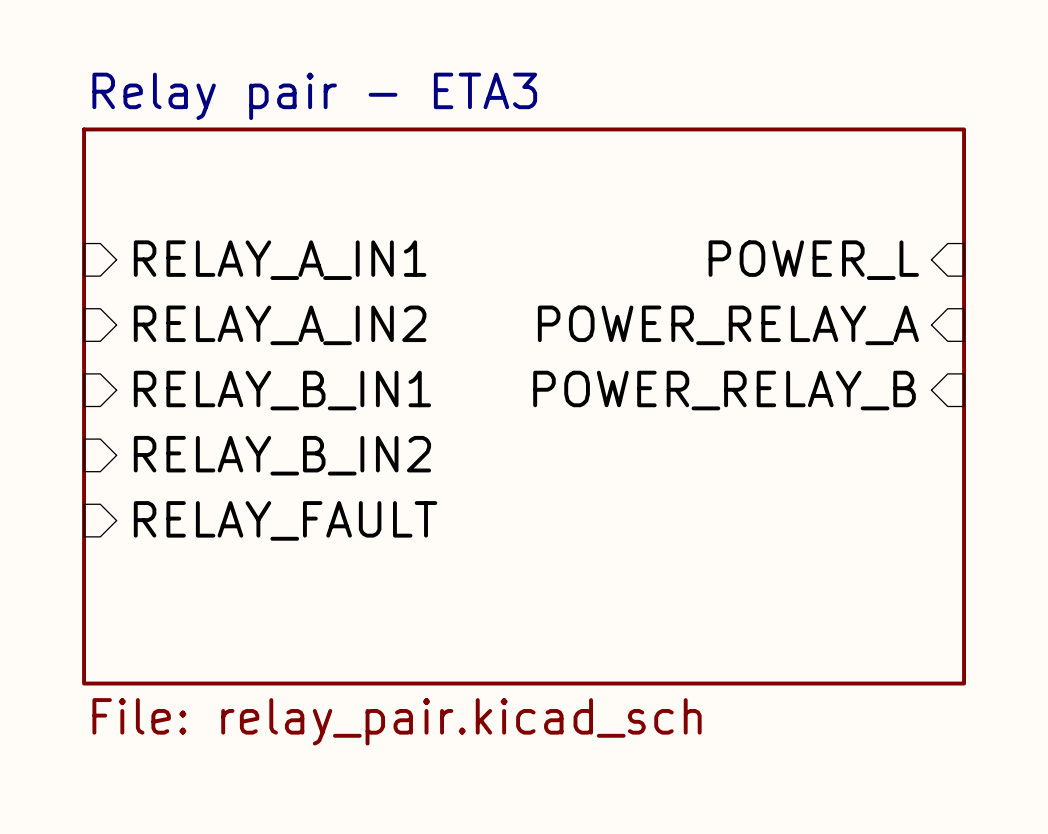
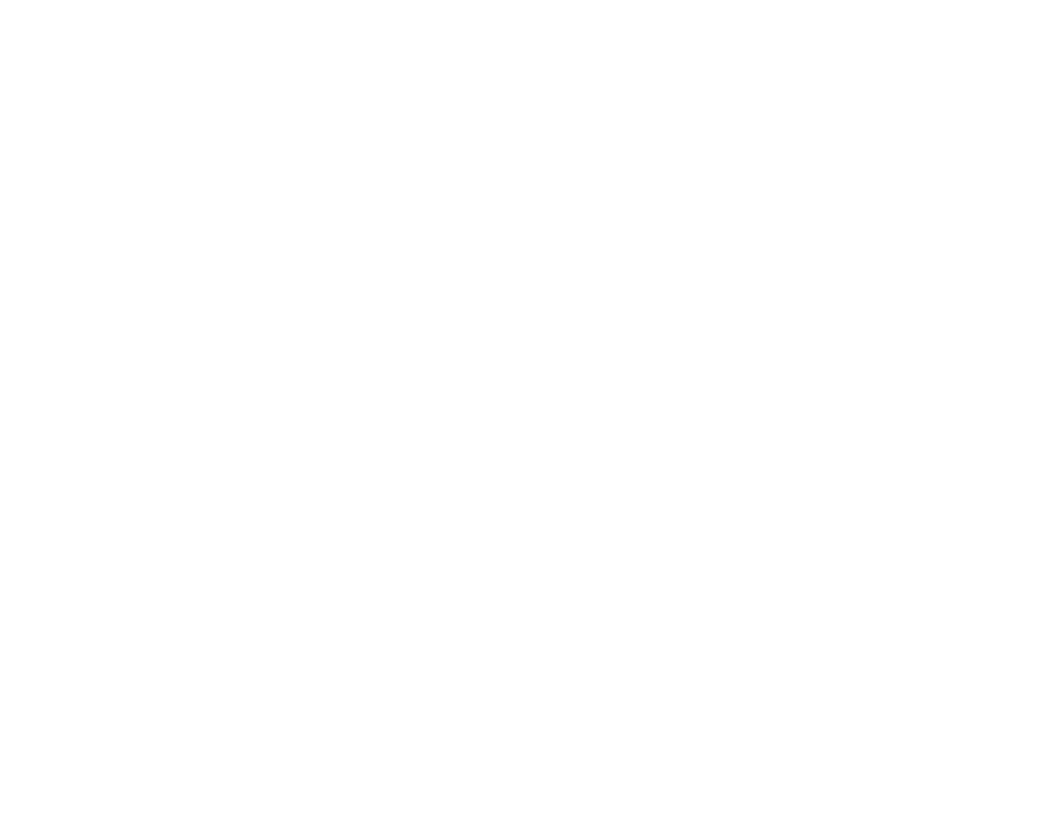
sheet pin: RELAY_A_IN1 (280, 260) -> none
sheet pin: POWER_L (813, 260) -> none
sheet pin: RELAY_A_IN2 (280, 325) -> none
sheet pin: POWER_RELAY_A (728, 325) -> none
sheet pin: RELAY_B_IN1 (282, 390) -> none
sheet pin: POWER_RELAY_B (724, 390) -> none
sheet Relay pair - ETA3: File: relay_pair.kicad_sch (524, 406) -> none
sheet pin: RELAY_B_IN2 (282, 455) -> none
sheet pin: RELAY_FAULT (285, 520) -> none

